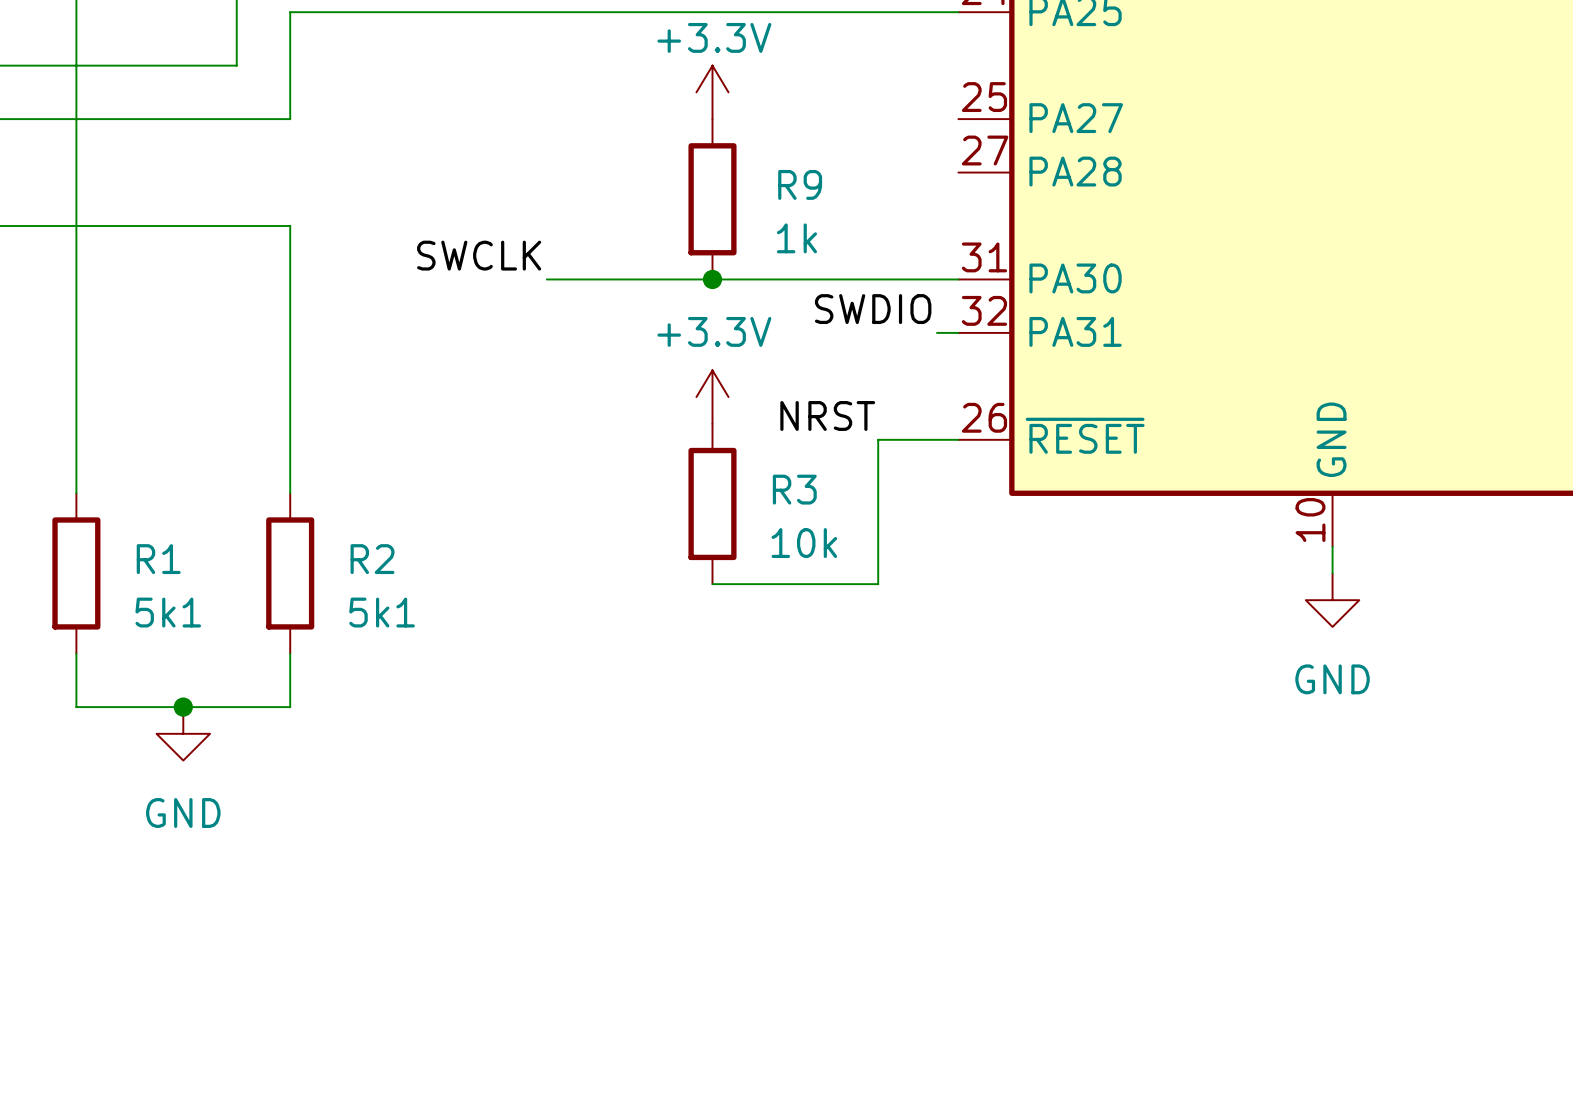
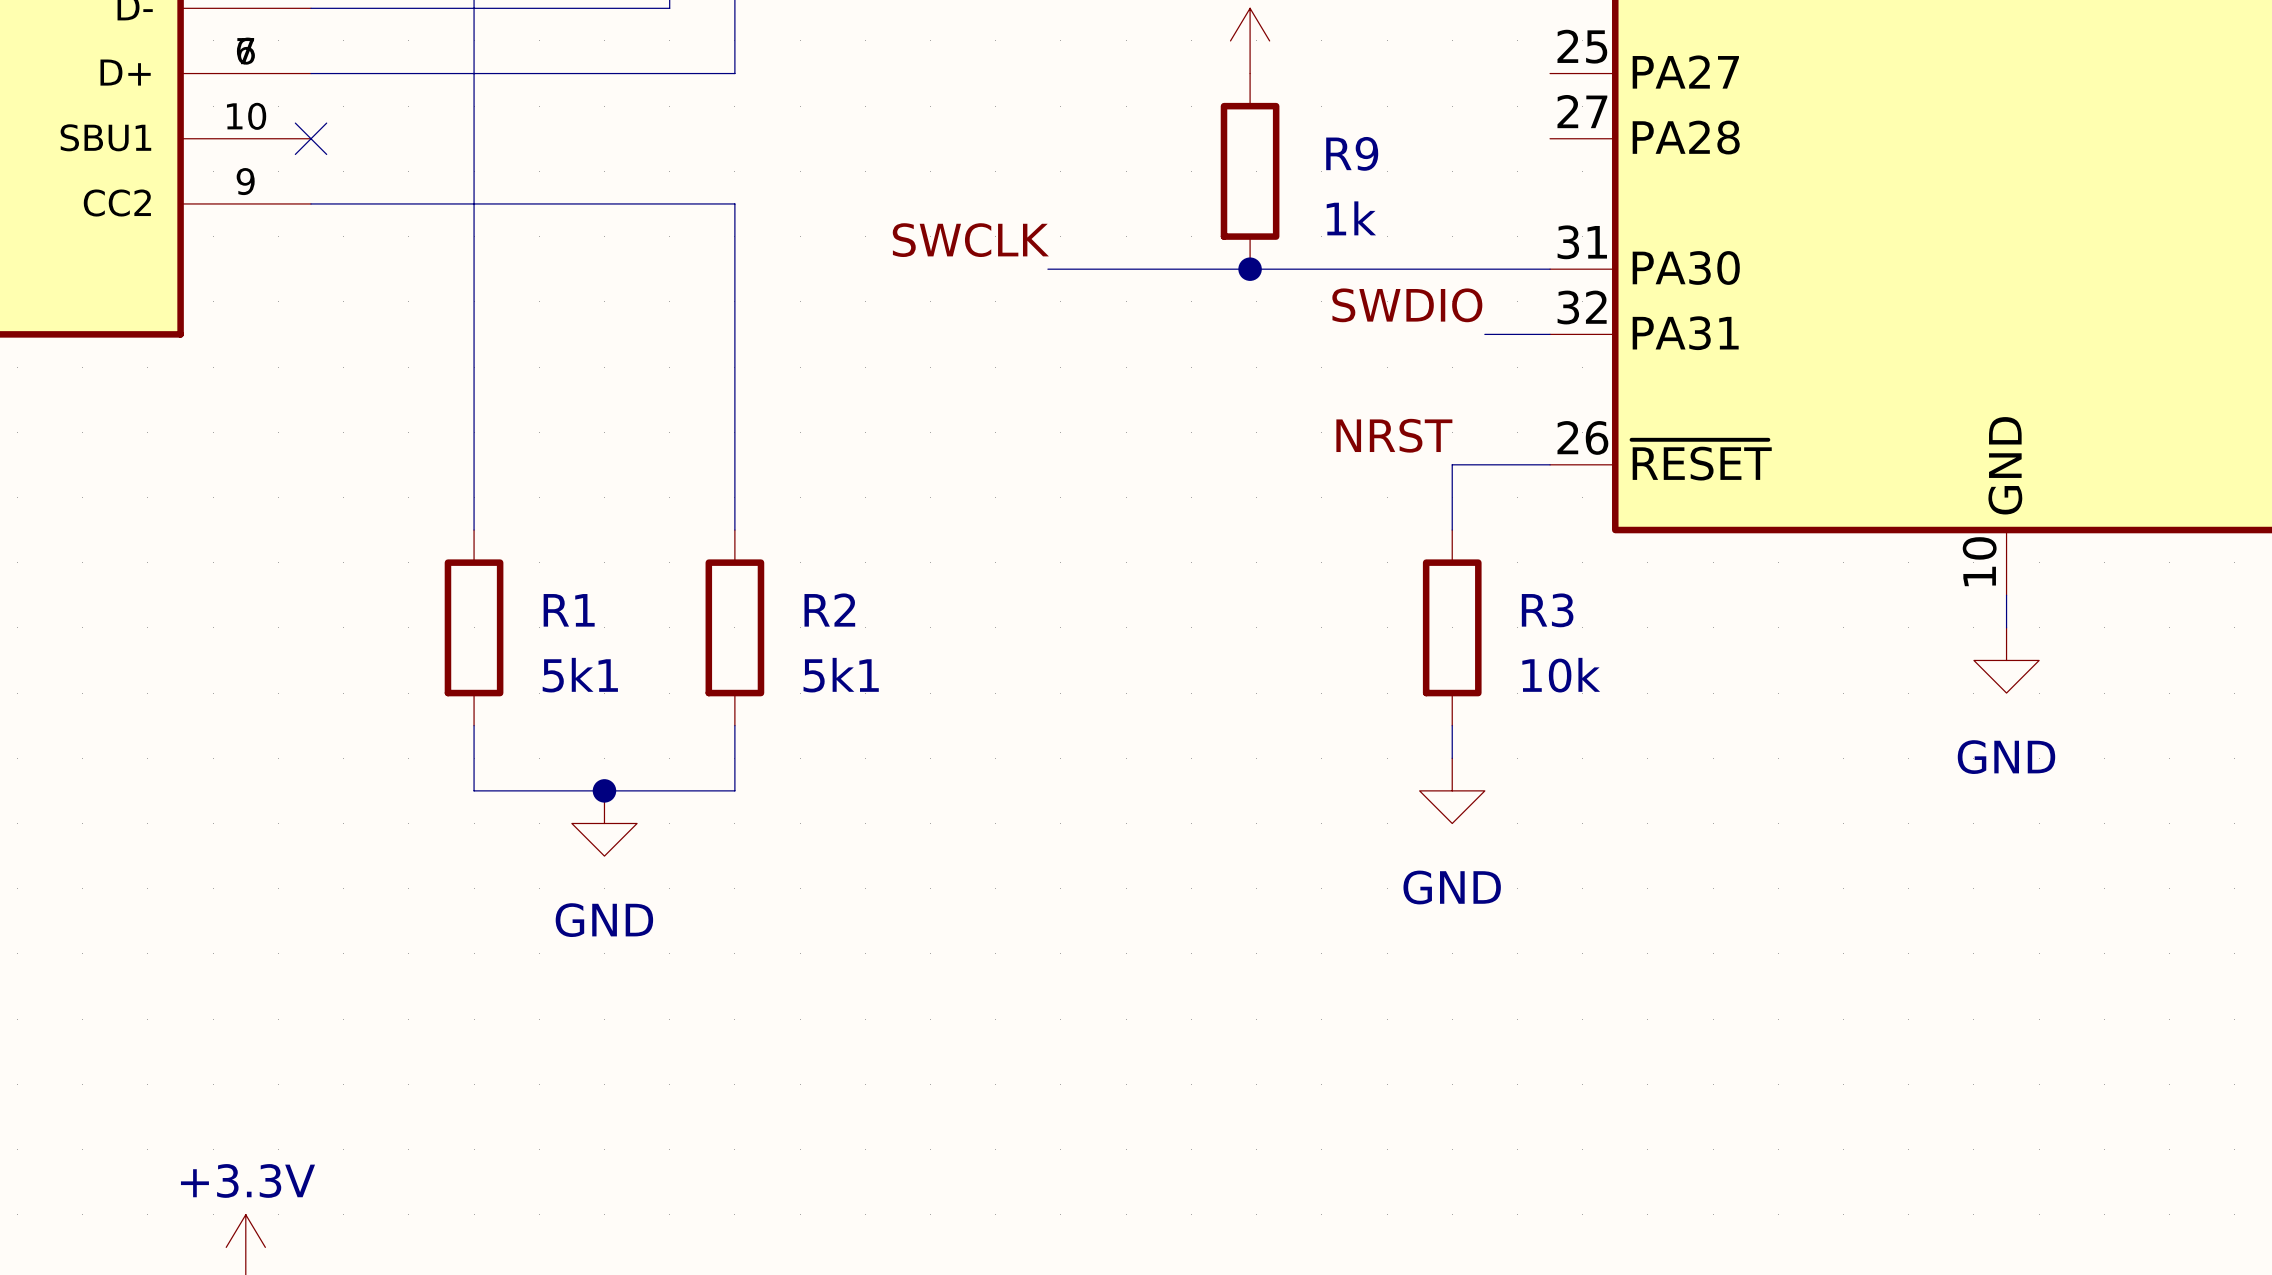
label position: SWDIO (873, 309) -> SWDIO (1407, 305)
wire: none -> (1484, 334) (1523, 334)
power symbol: +3.3V (712, 397) -> none
wire: (878, 493) (878, 584) (712, 584) -> none
R3 position: (712, 503) -> (1452, 627)
wire: none -> (1452, 725) (1452, 758)
power symbol: none -> GND (1452, 790)

